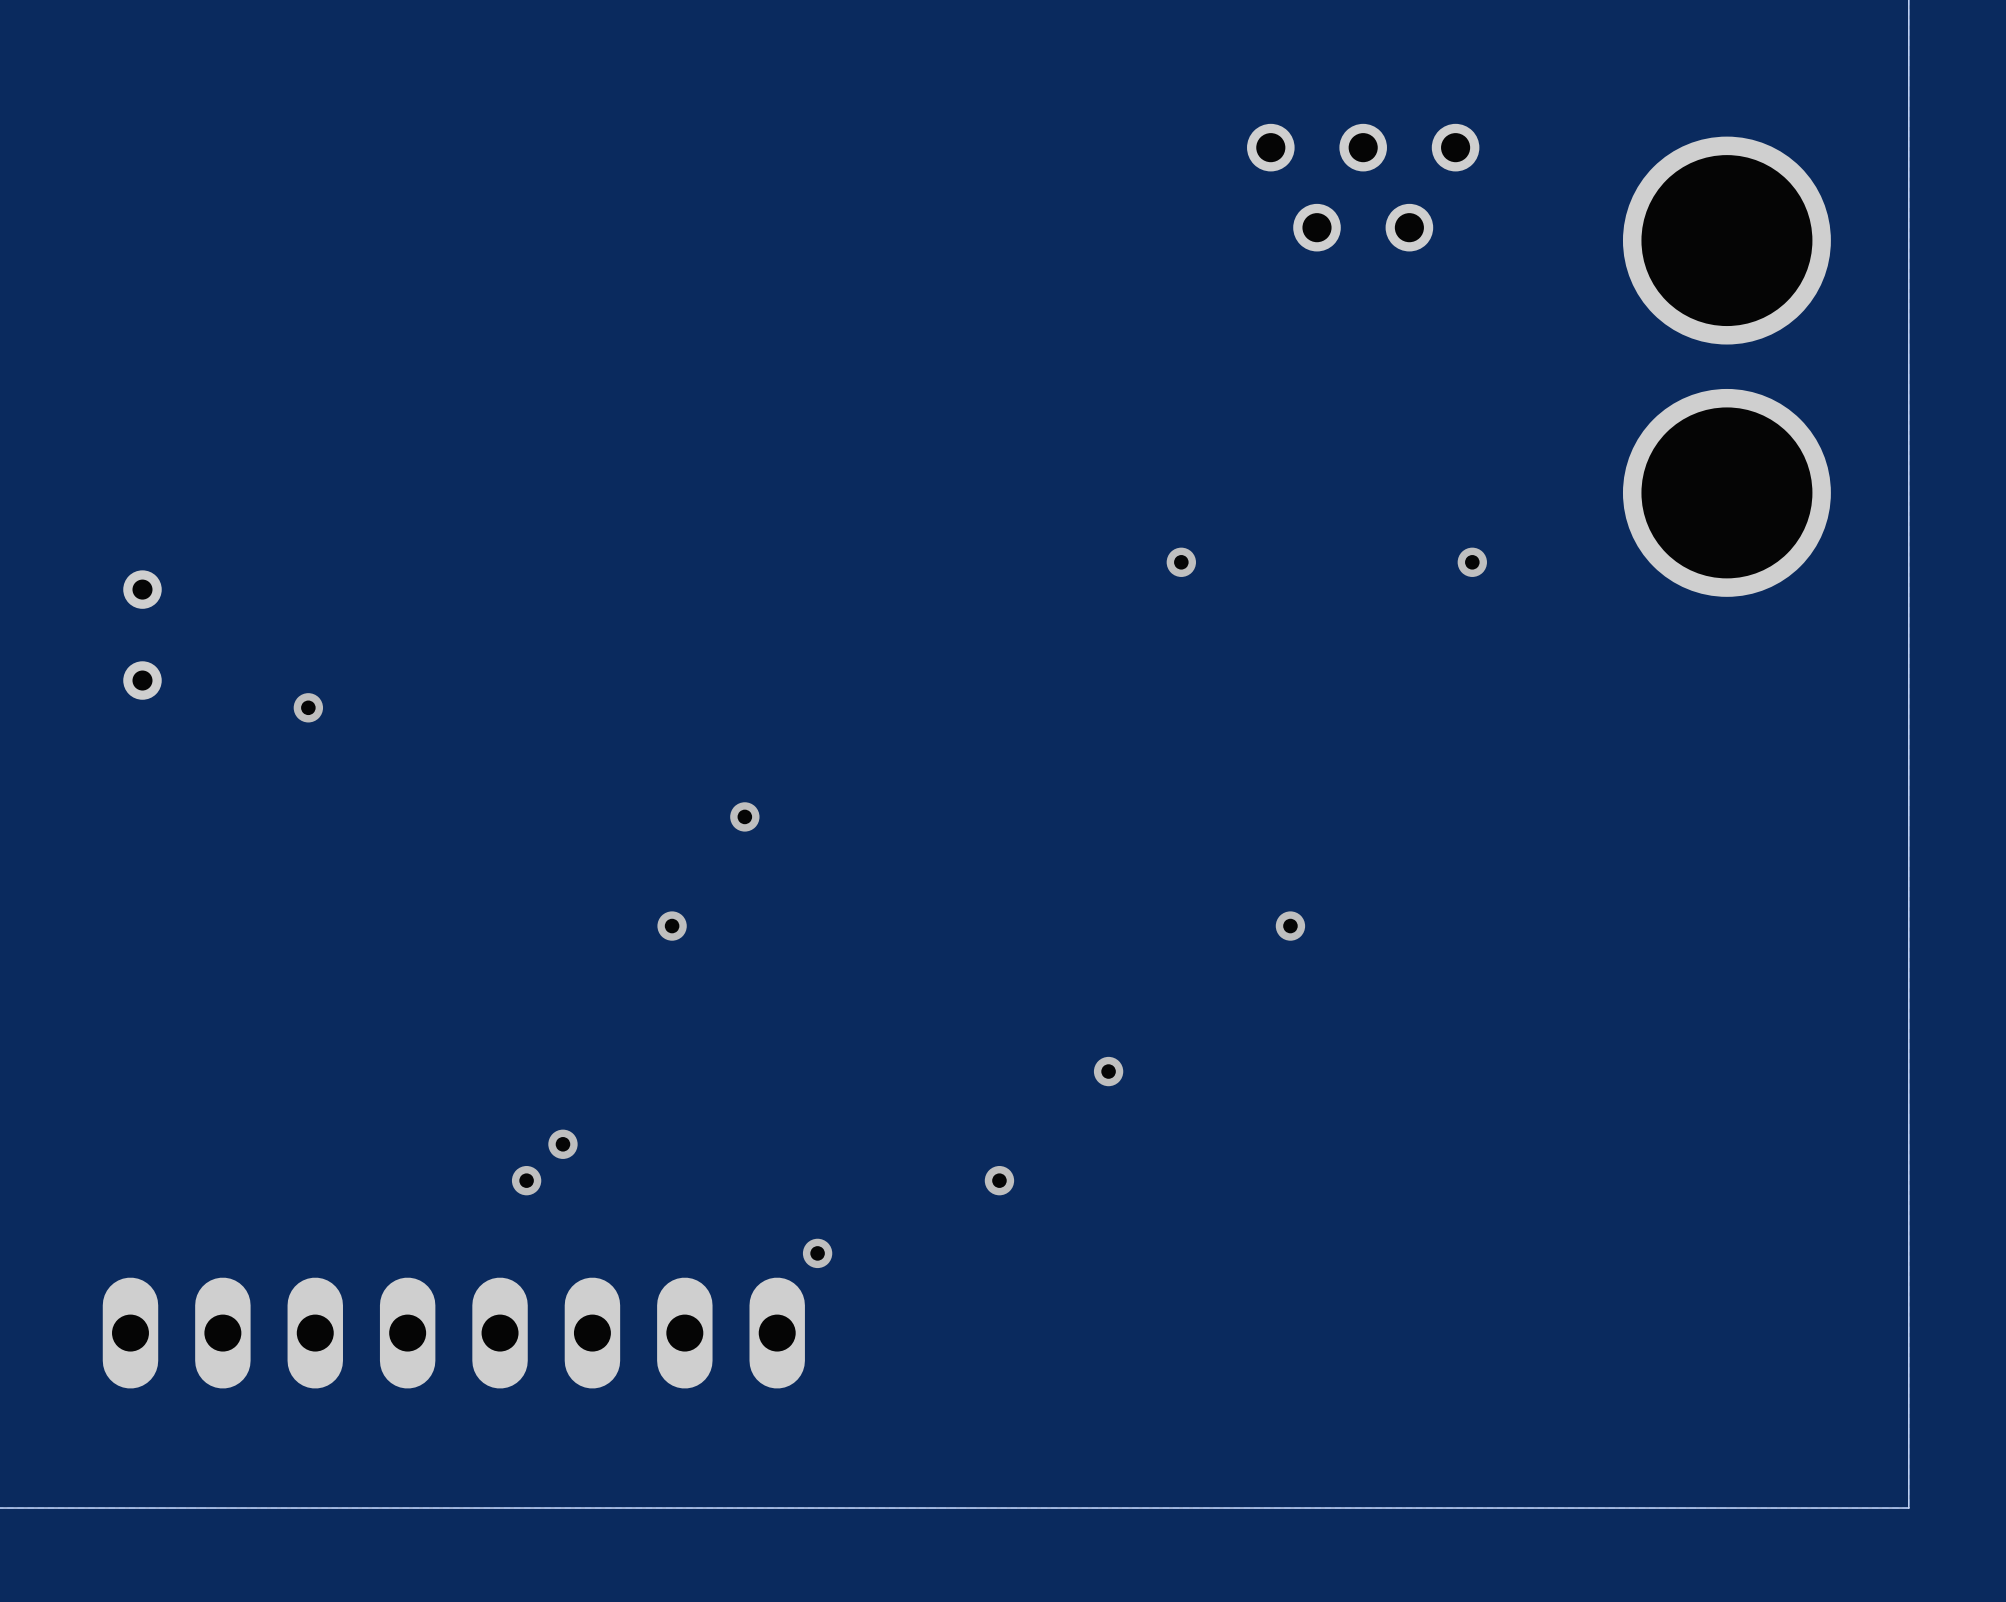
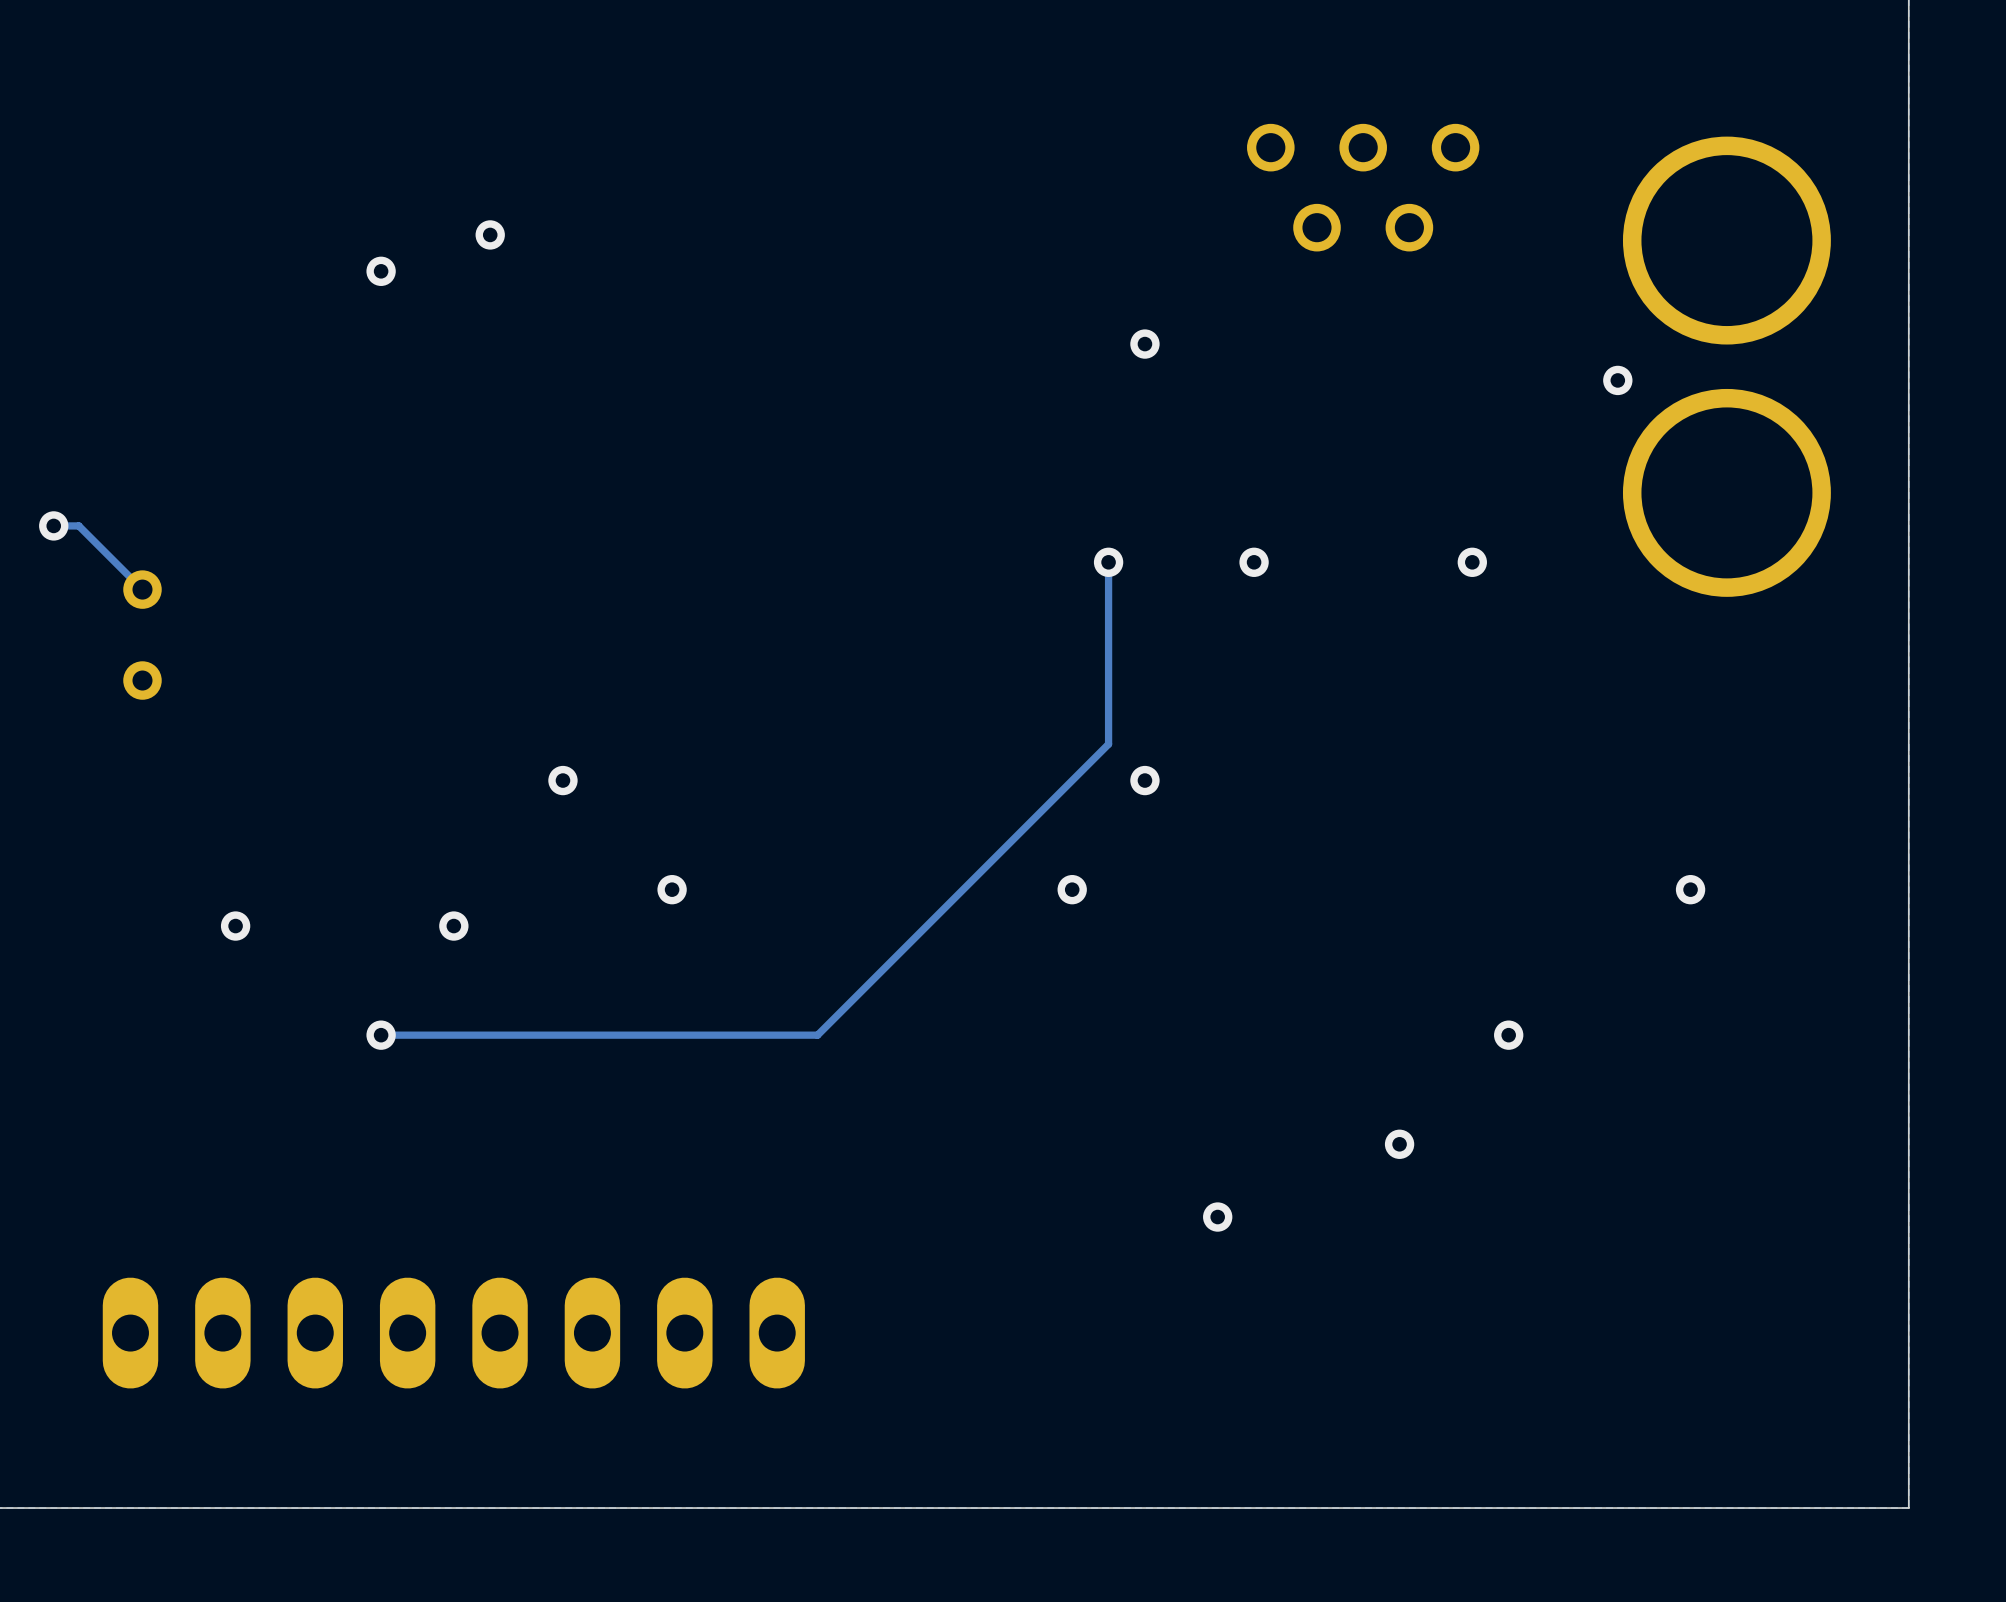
via: none -> (490, 234)
via: none -> (381, 271)
via: none -> (1144, 344)
via: none -> (1617, 380)
track: none -> (53, 525) (78, 525) (142, 589)
via: none -> (53, 525)
track: none -> (1108, 562) (1108, 744) (817, 1035) (381, 1035)
via: none -> (1108, 562)
via: (1181, 562) -> none
via: none -> (1254, 562)
via: (308, 707) -> none
via: none -> (562, 780)
via: none -> (1144, 780)
via: (744, 816) -> none
via: none -> (1072, 889)
via: none -> (1690, 889)
via: none -> (235, 926)
via: none -> (453, 926)
via position: (672, 926) -> (672, 889)
via: (1290, 926) -> none
via: none -> (381, 1035)
via: none -> (1508, 1035)
via: (1108, 1071) -> none
via: (562, 1144) -> none
via: none -> (1399, 1144)
via: (526, 1180) -> none
via: (999, 1180) -> none
via: none -> (1217, 1217)
via: (817, 1253) -> none

